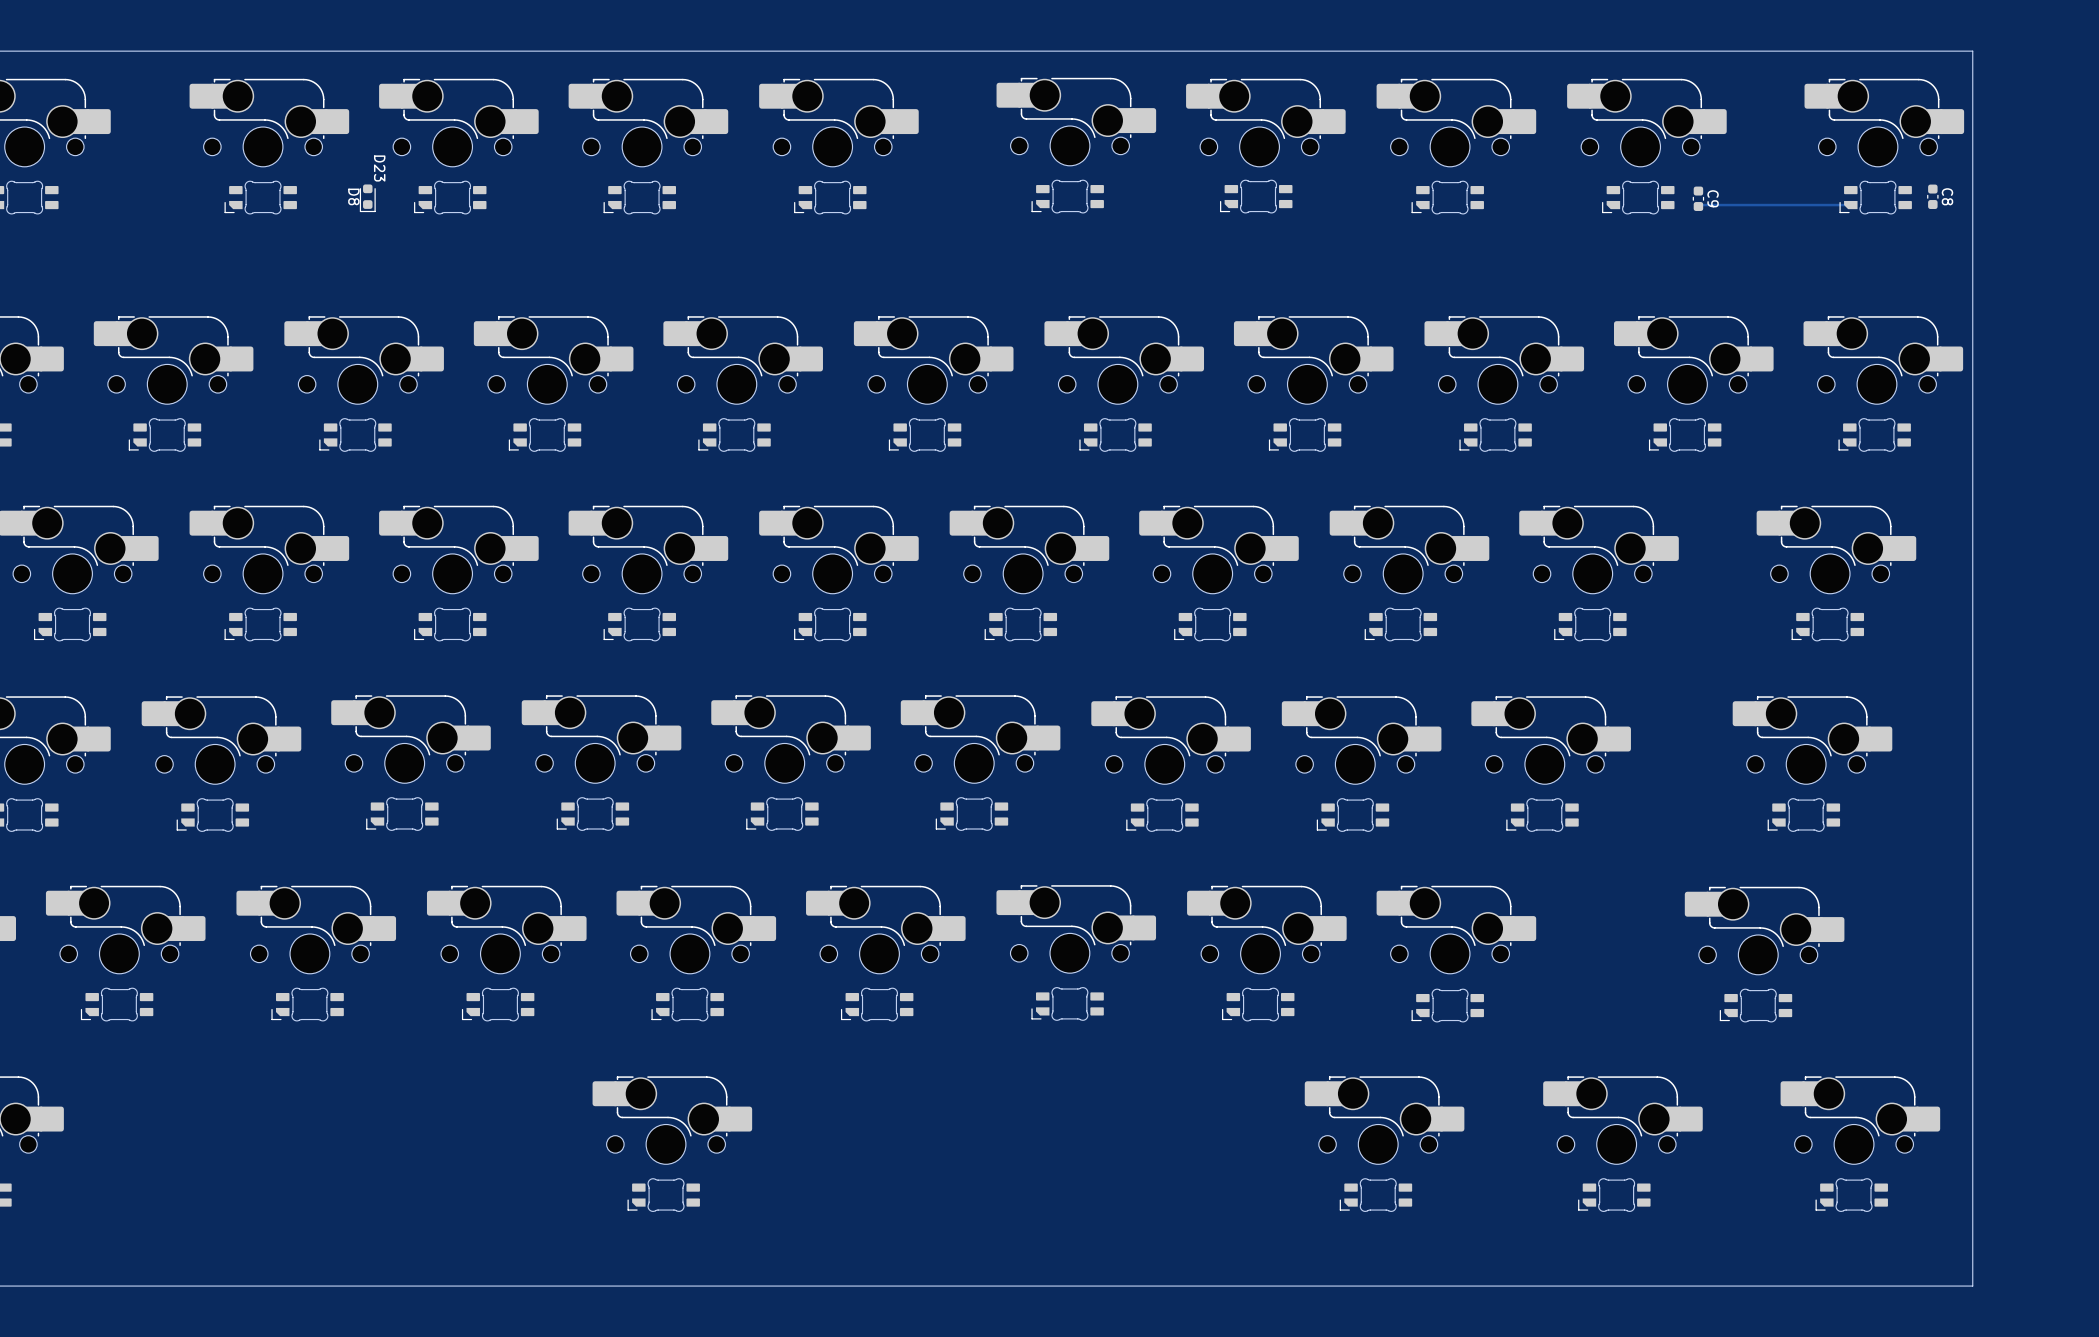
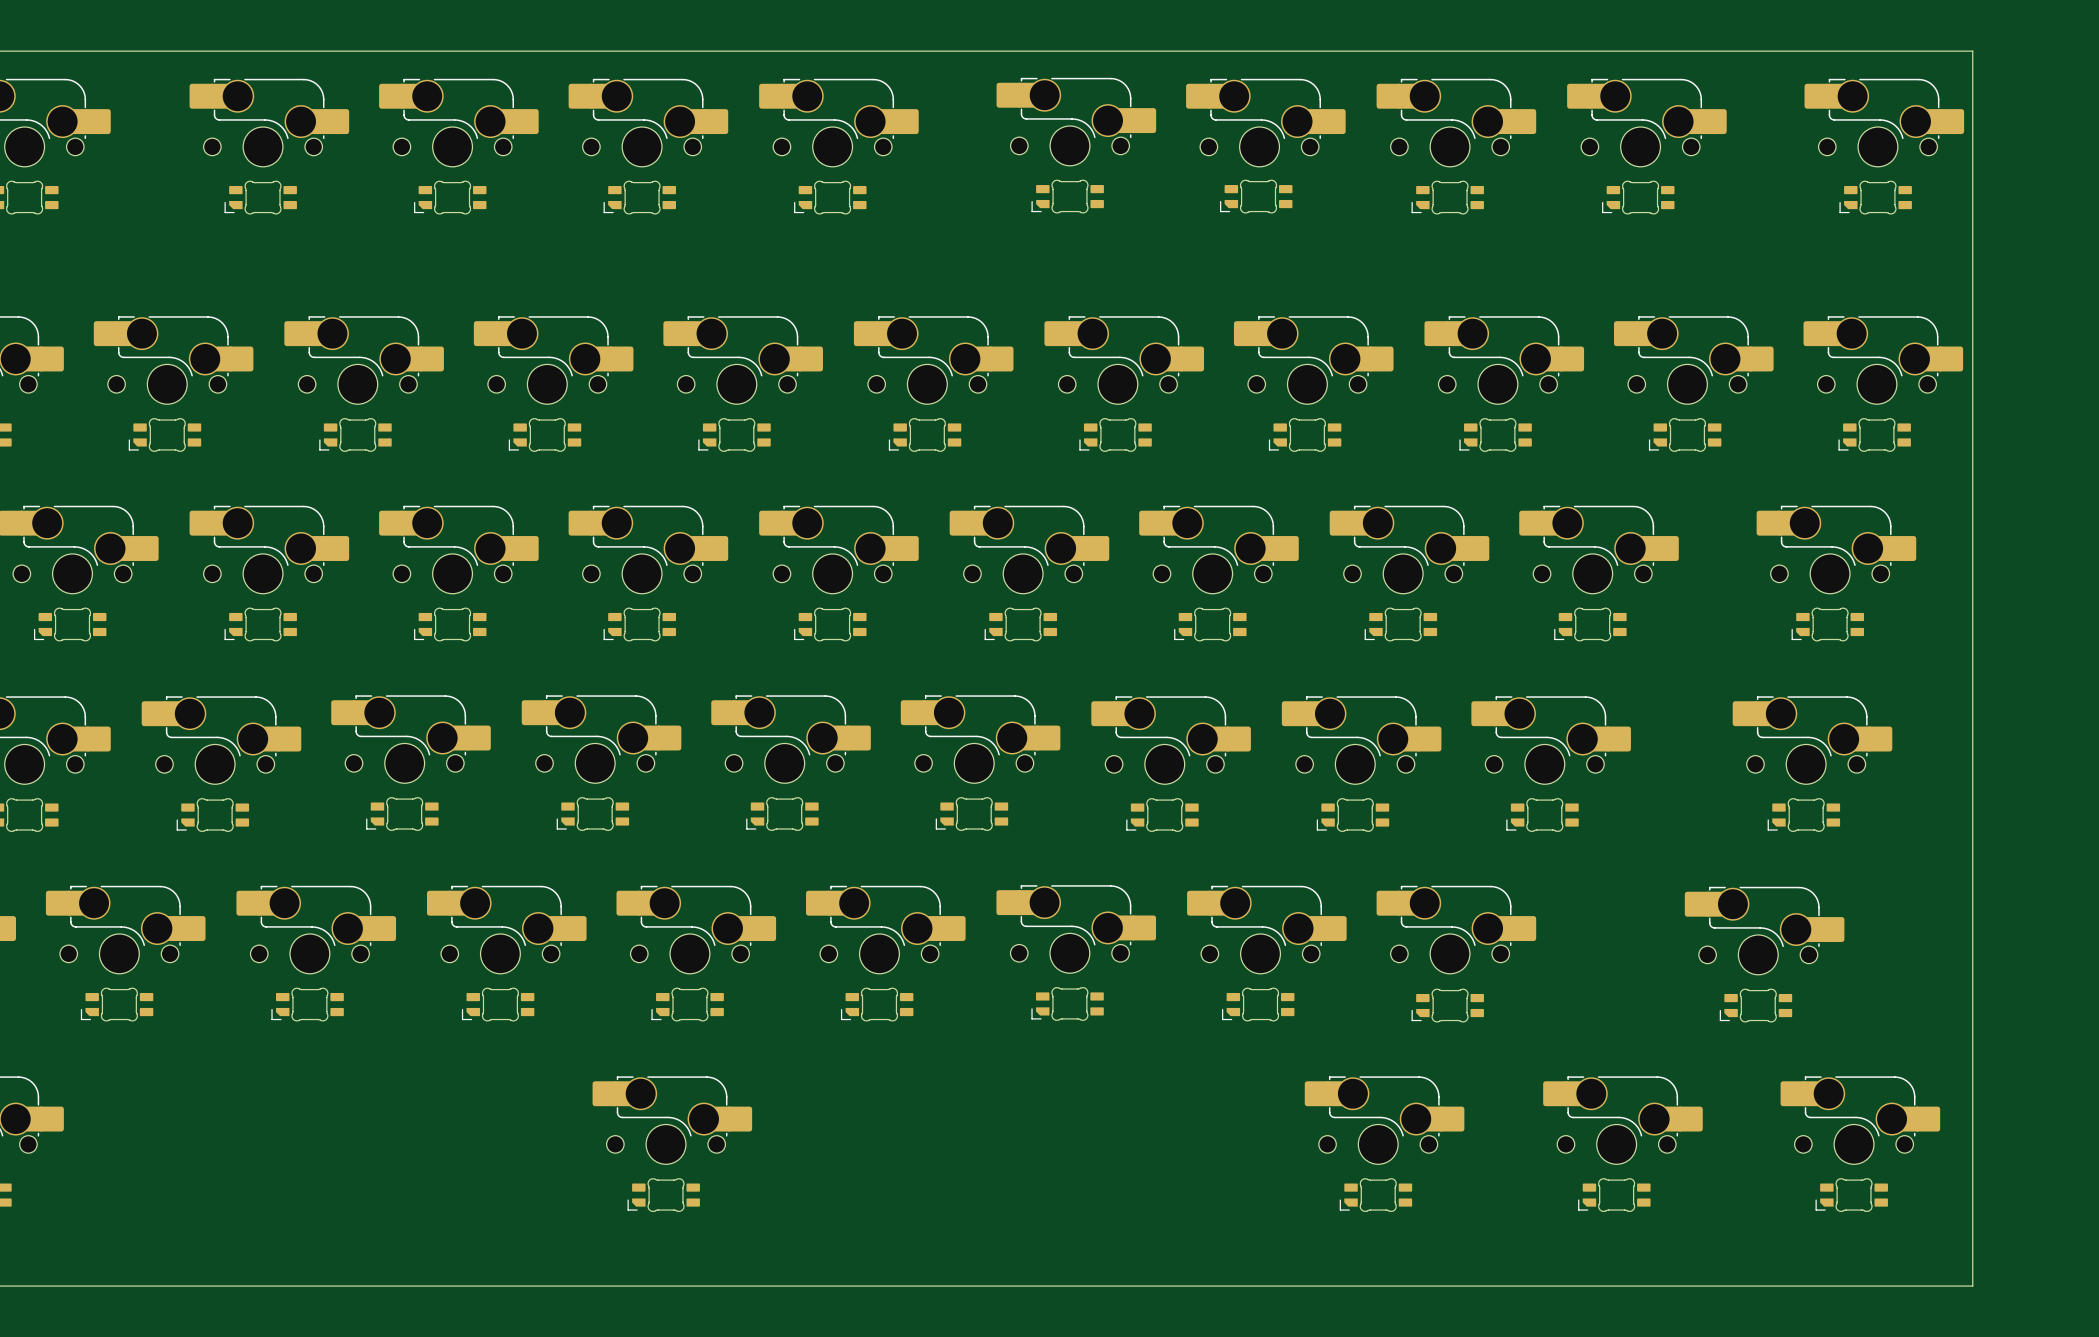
D23: (379, 168) -> none
C8: (1932, 196) -> none
D8: (367, 198) -> none
C9: (1698, 198) -> none
track: (1850, 205) (1698, 206) -> none

